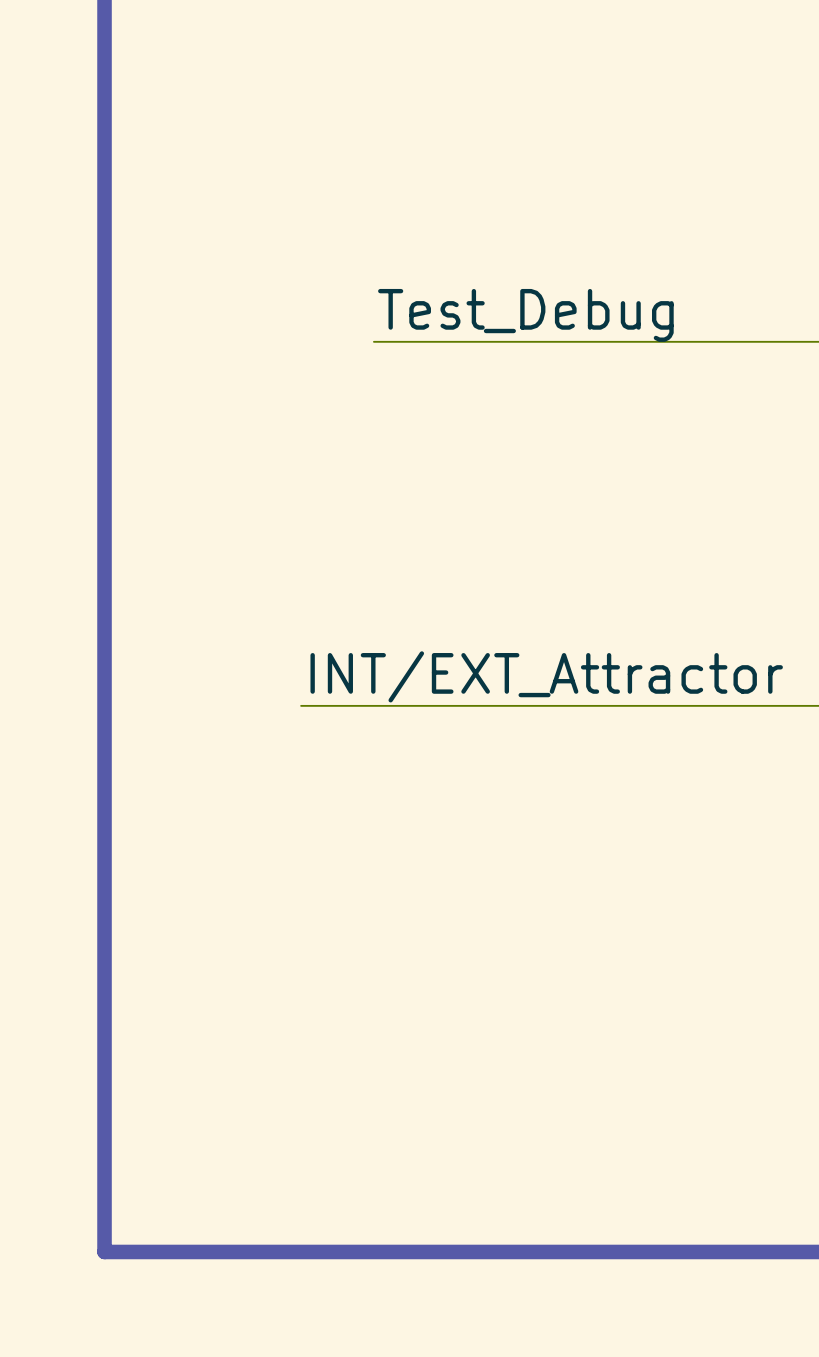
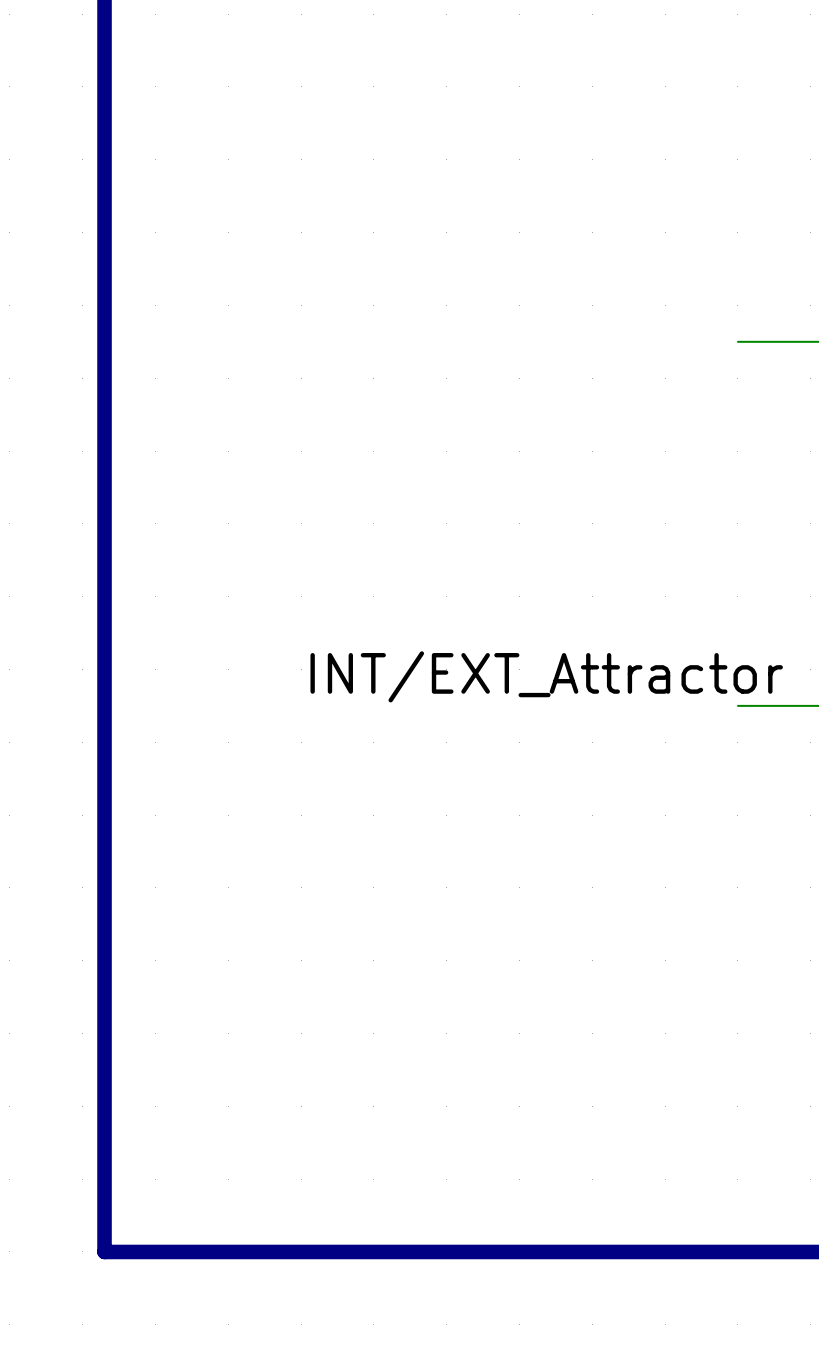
label: Test_Debug (525, 315) -> none
wire: (373, 341) (737, 341) -> none
wire: (301, 705) (737, 705) -> none

